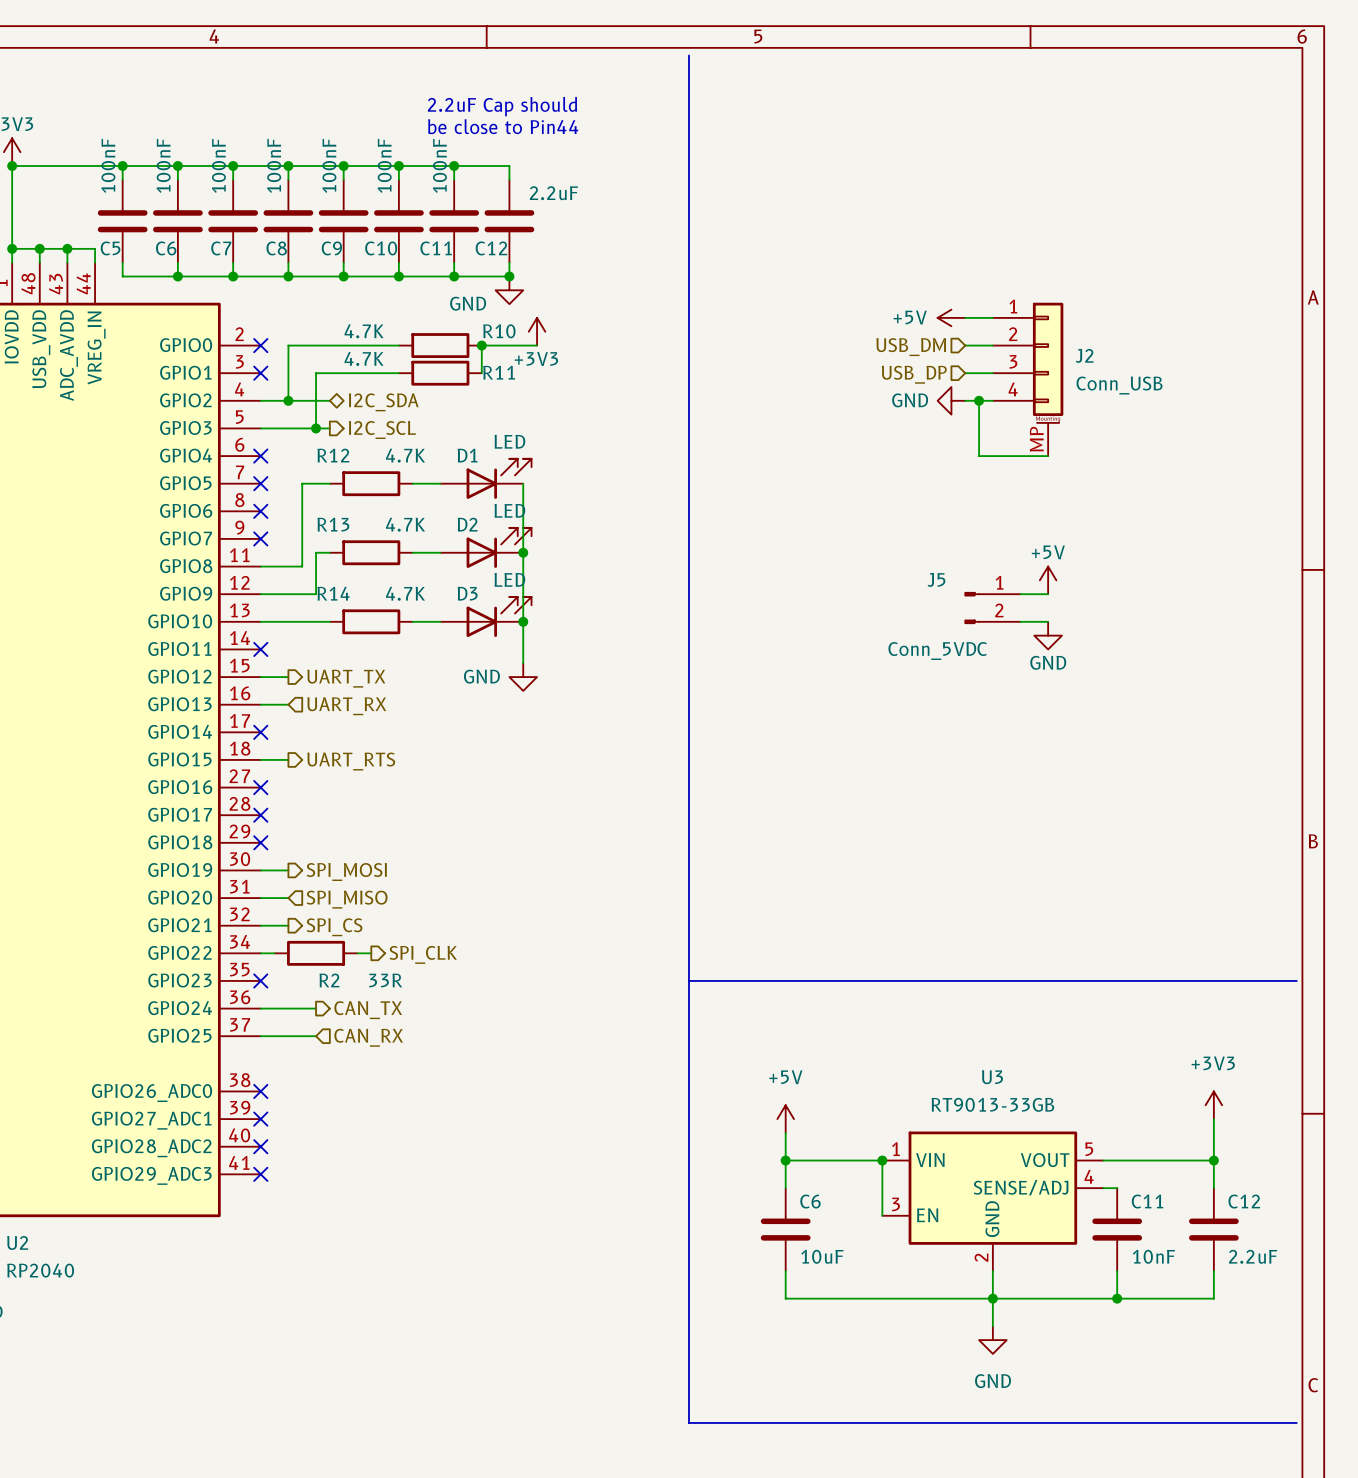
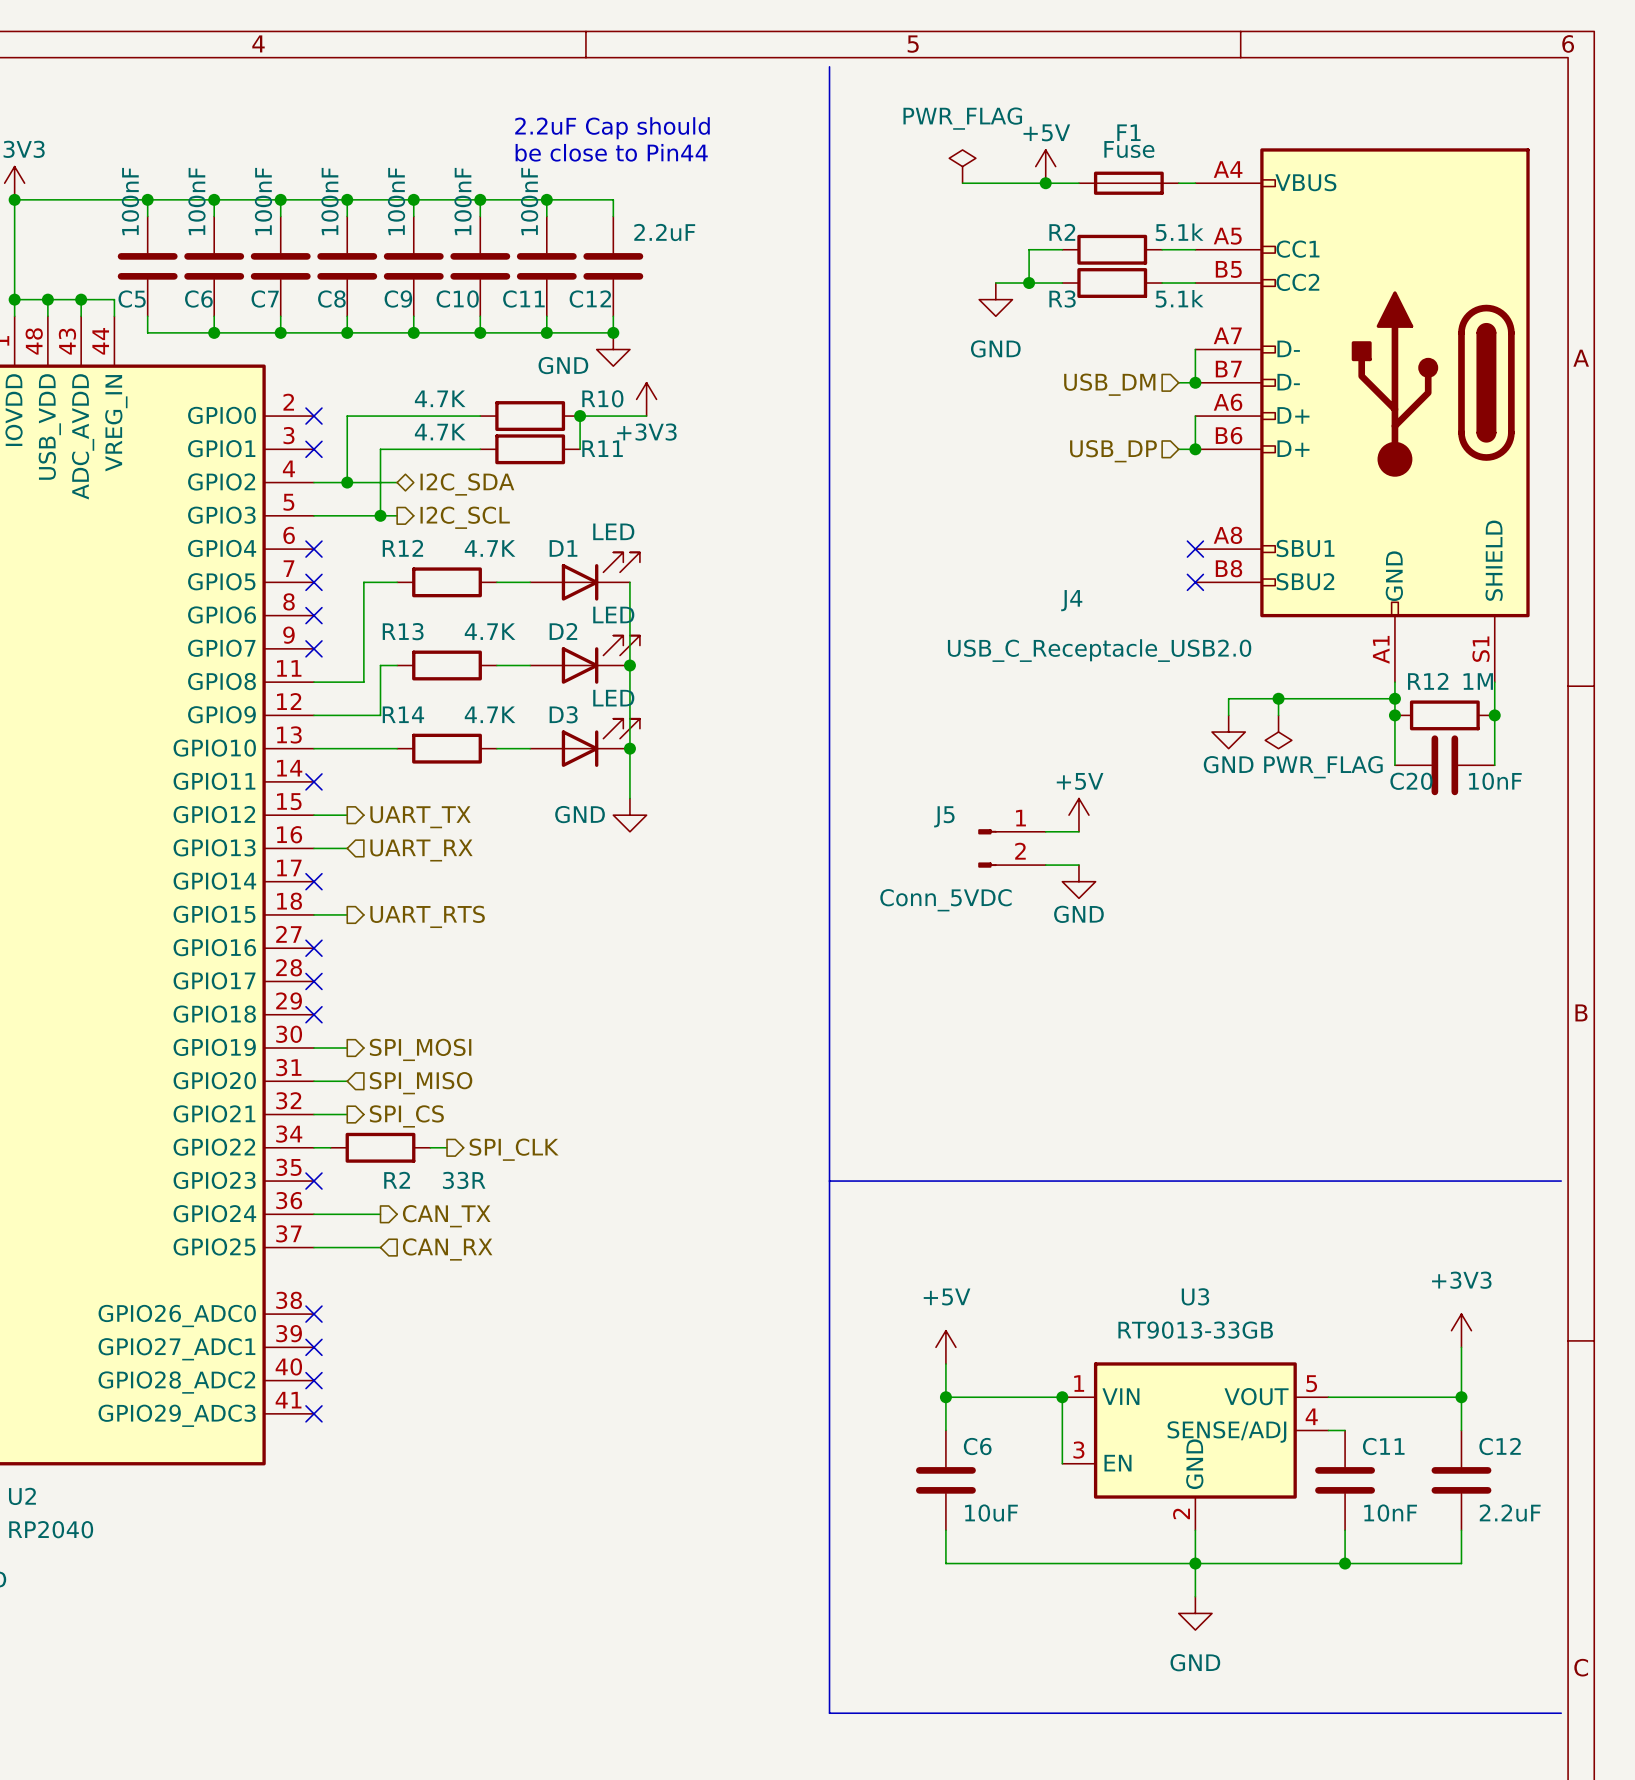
power symbol: none -> PWR_FLAG (962, 166)
power symbol: none -> +5V (1045, 166)
wire: none -> (962, 183) (1078, 183)
junction: none -> (1045, 183)
F1: none -> Fuse (1128, 183)
wire: none -> (1062, 249) (1029, 249) (1029, 283)
R2: none -> 5.1k (1112, 249)
wire: none -> (1162, 249) (1195, 249)
wire: none -> (995, 283) (1062, 283)
junction: none -> (1029, 283)
R3: none -> 5.1k (1112, 283)
power symbol: none -> GND (995, 299)
wire: none -> (1195, 349) (1195, 382)
power symbol: +5V (951, 317) -> none
wire: (965, 317) (979, 317) -> (1178, 183) (1195, 183)
junction: none -> (1195, 382)
J4: none -> USB_C_Receptacle_USB2.0 (1362, 415)
wire: (965, 345) (992, 345) -> (1195, 449) (1195, 416)
hierarchical label position: USB_DM (911, 347) -> USB_DM (1109, 384)
wire: (965, 373) (979, 373) -> none
hierarchical label position: USB_DP (914, 374) -> USB_DP (1113, 451)
J2: Conn_USB (1028, 379) -> none
power symbol: GND (951, 400) -> none
wire: (965, 400) (992, 400) -> (1162, 283) (1195, 283)
wire: (979, 400) (979, 456) (1048, 456) -> none
junction position: (979, 400) -> (1195, 449)
no-connect mark: none -> (1195, 549)
no-connect mark: none -> (1195, 582)
wire: none -> (1394, 682) (1394, 765)
wire: none -> (1494, 682) (1494, 765)
power symbol position: +5V (1048, 580) -> +5V (1078, 815)
wire: none -> (1278, 698) (1278, 715)
junction: none -> (1278, 698)
junction: none -> (1394, 698)
wire: (1020, 594) (1048, 594) -> (1228, 715) (1228, 698) (1394, 698)
junction: none -> (1394, 715)
R12: none -> 1M (1444, 715)
junction: none -> (1494, 715)
J5 position: (992, 608) -> (1011, 848)
power symbol: none -> PWR_FLAG (1278, 732)
wire: (1020, 621) (1048, 621) -> (1045, 865) (1078, 865)
power symbol position: GND (1048, 635) -> GND (1228, 732)
C20: none -> 10nF (1444, 765)
wire: none -> (1045, 831) (1078, 831)
power symbol: none -> GND (1078, 881)

